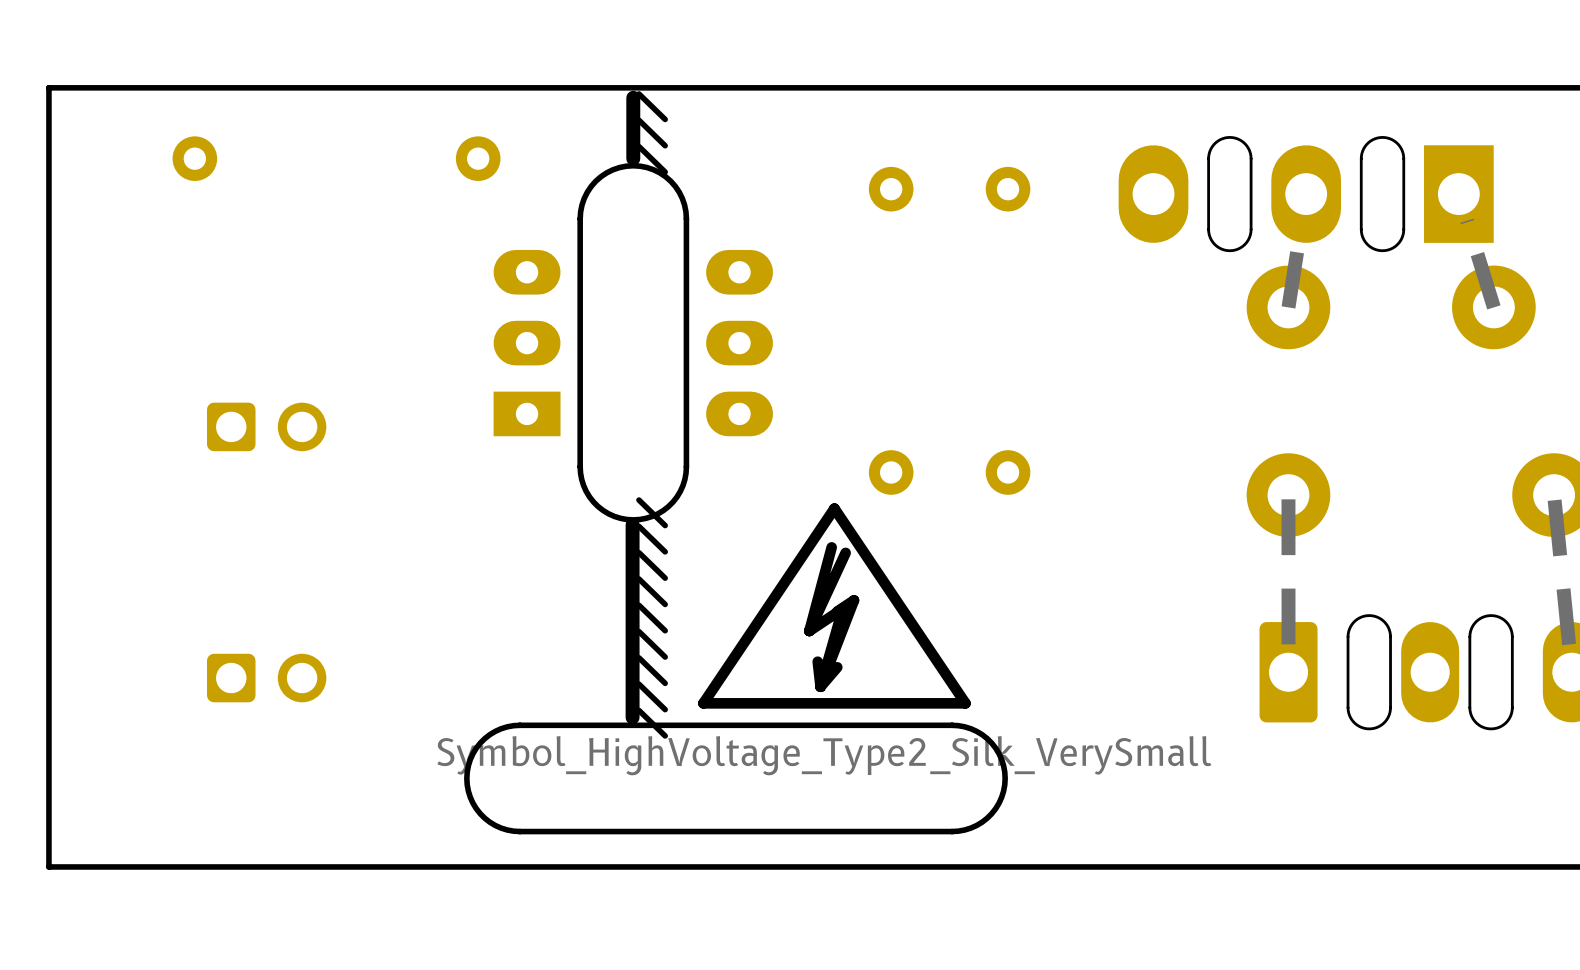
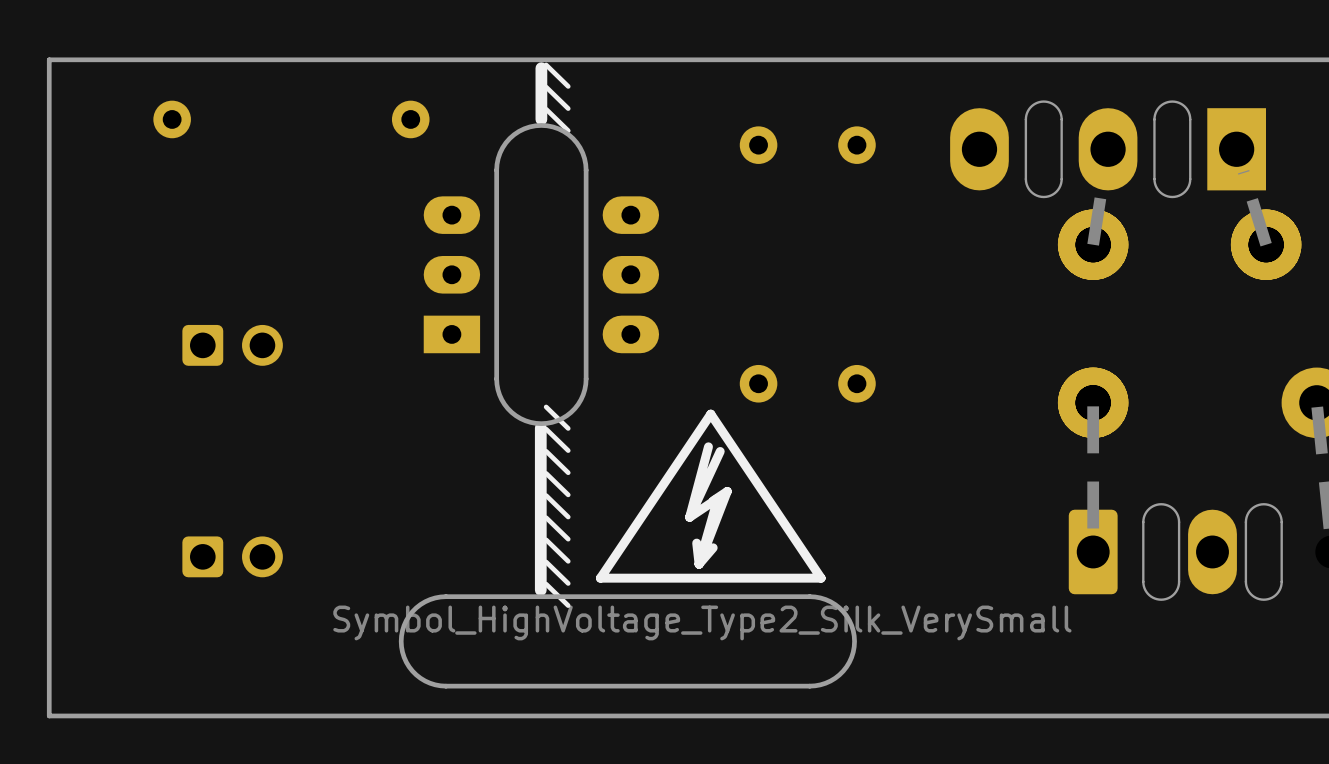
part: none -> (1093, 244)
part: none -> (1266, 244)
part: none -> (1093, 402)

